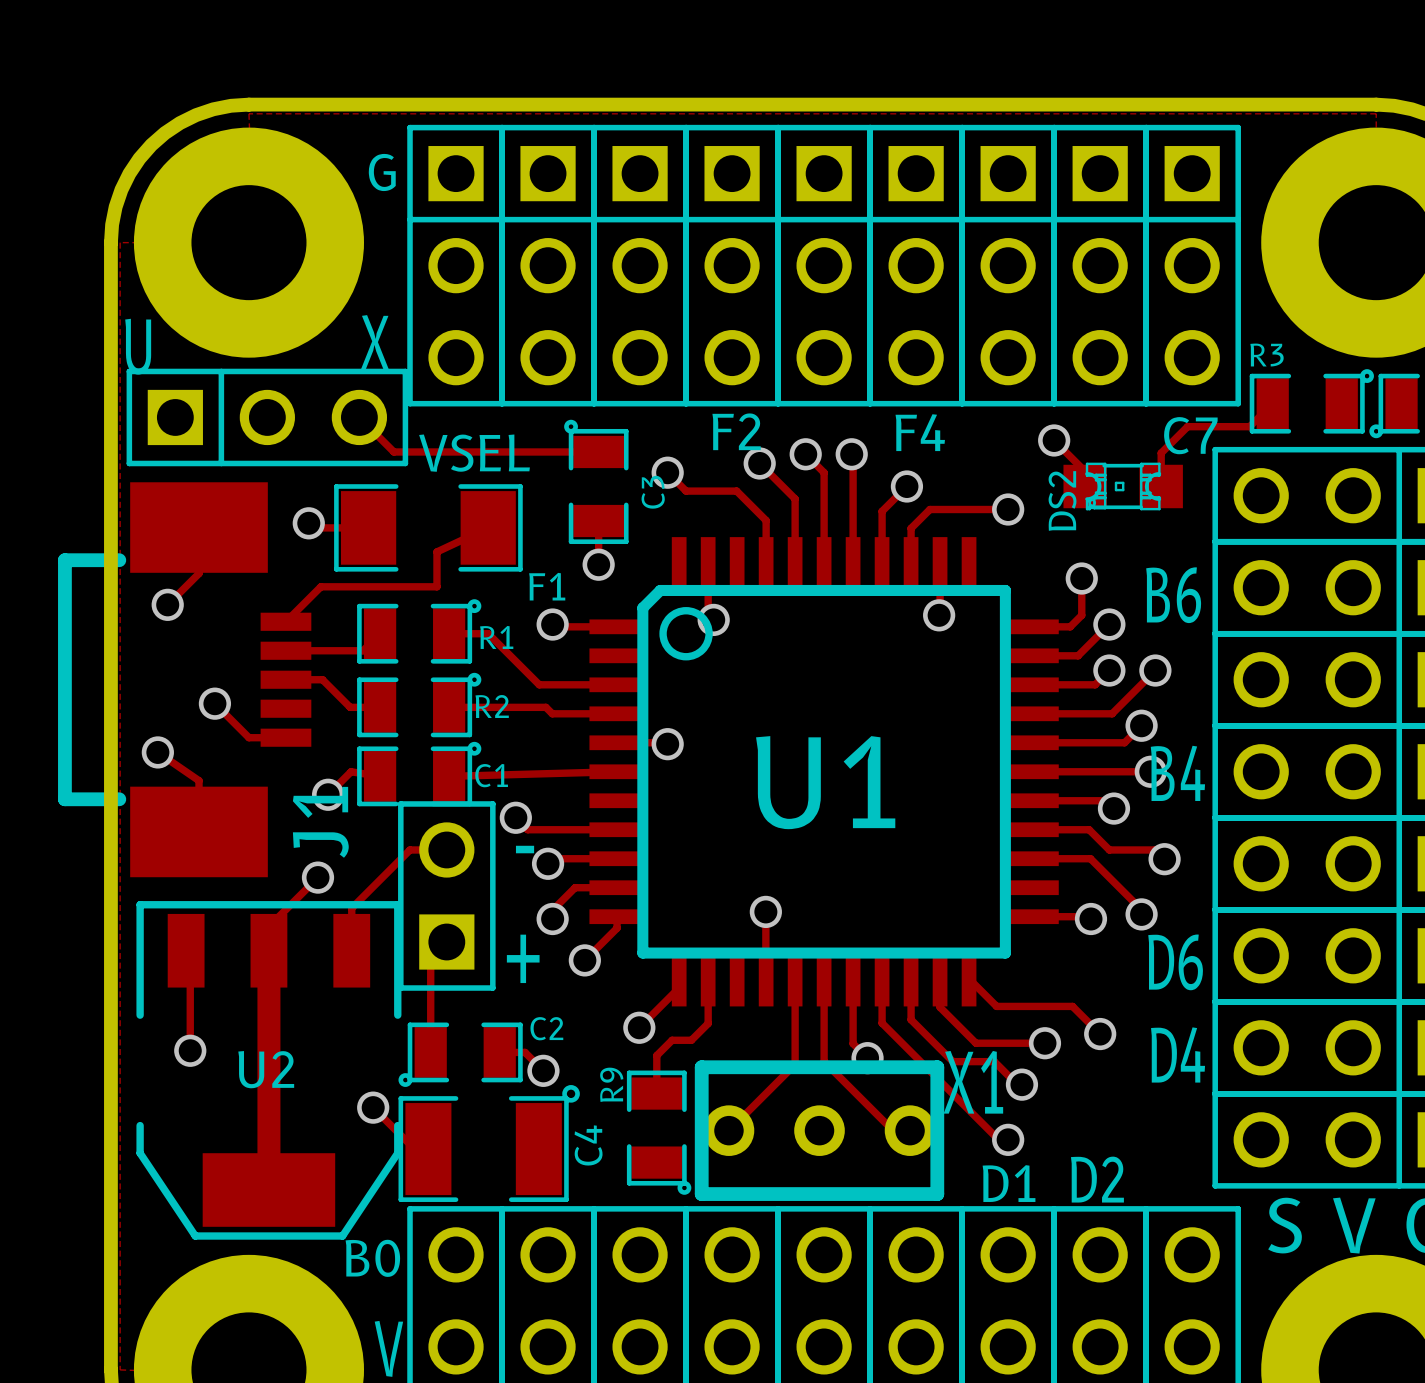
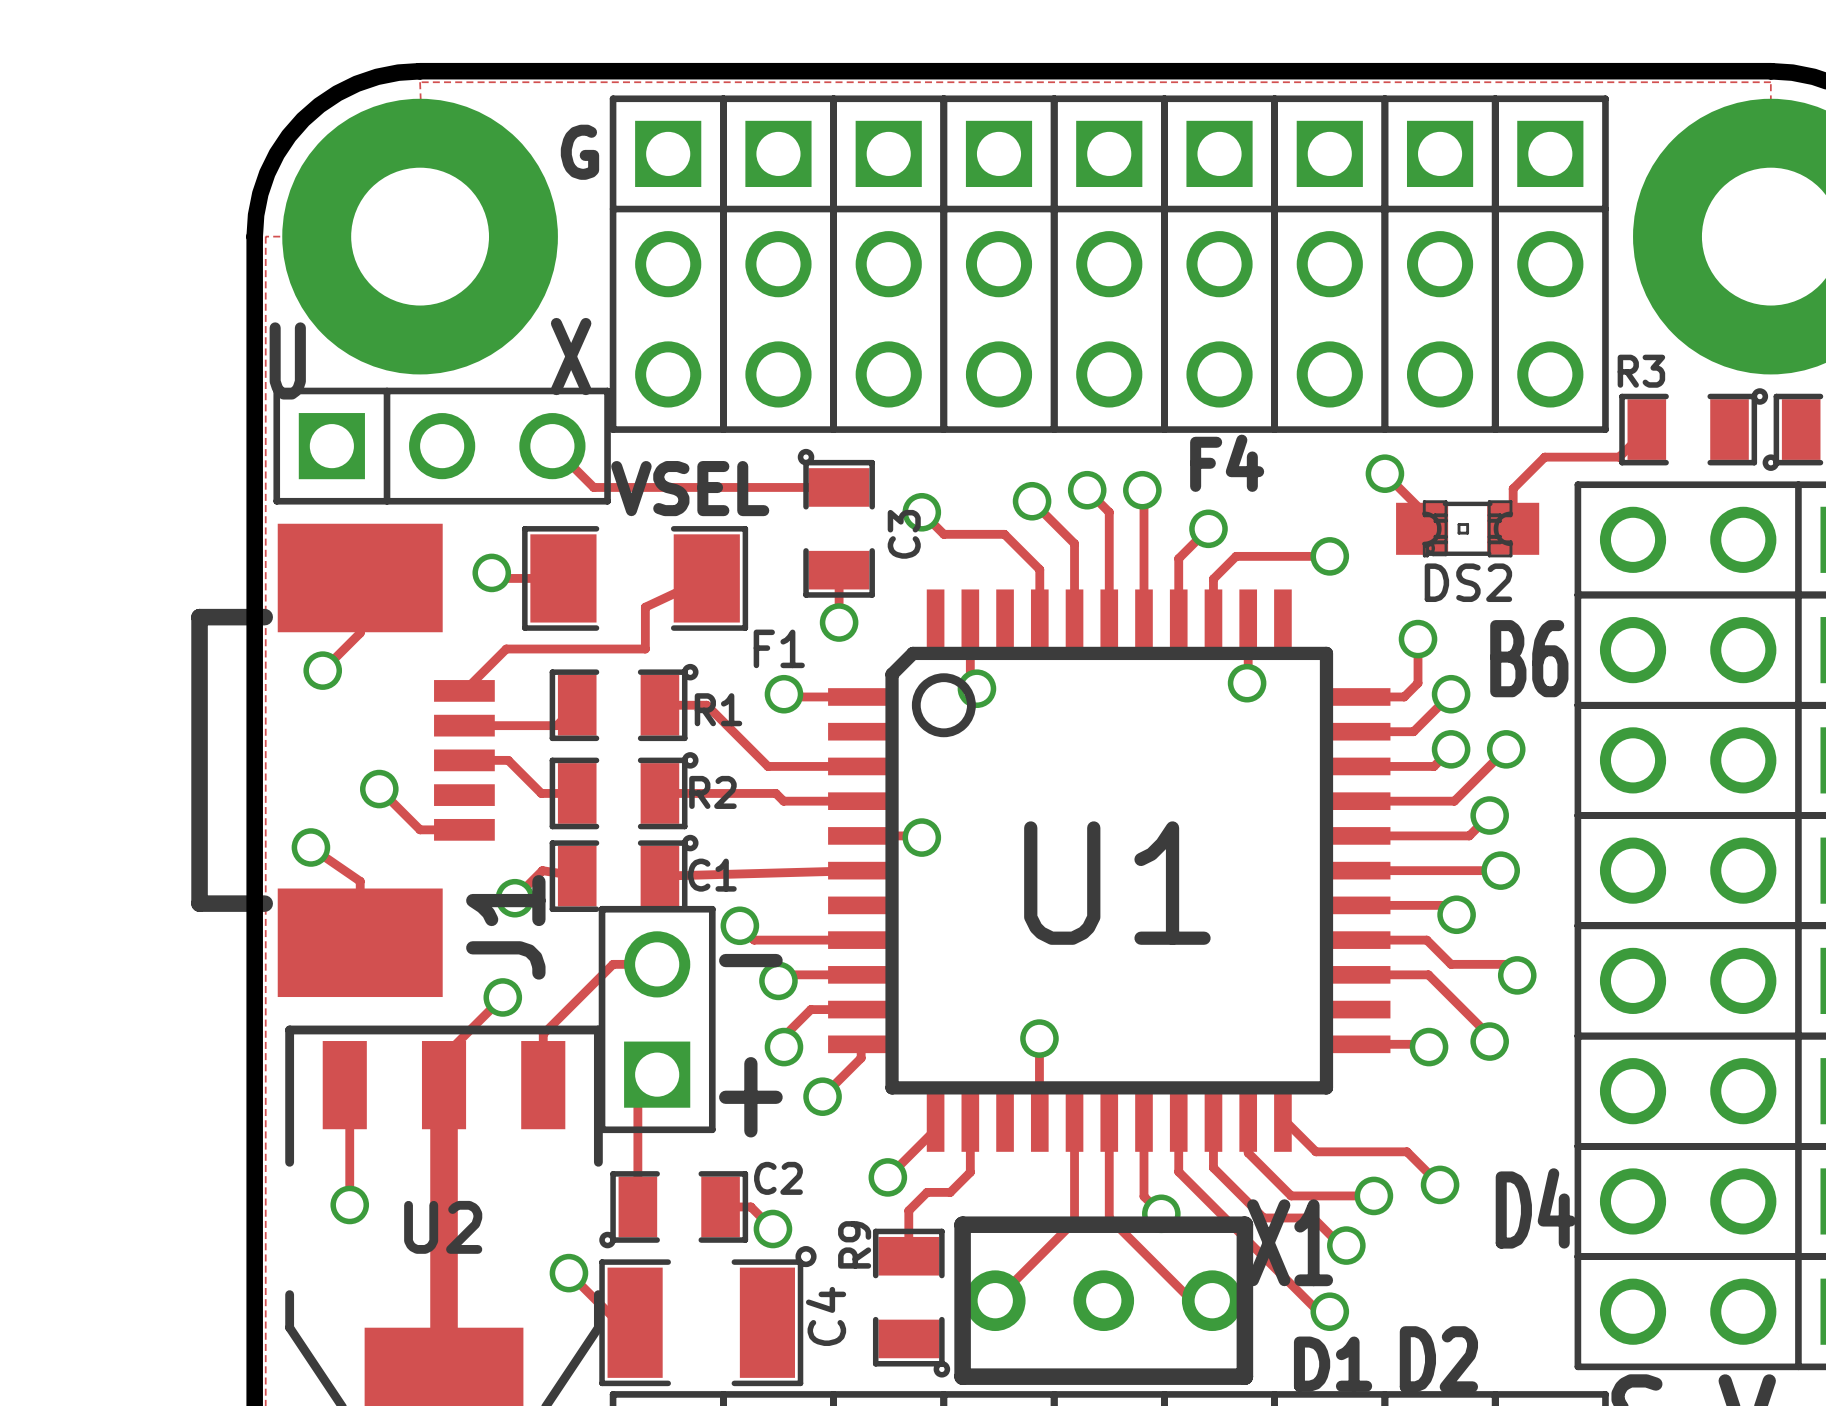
text: F2 (736, 431) -> none
text: C7 (1190, 435) -> none
DS2 name rotation: 0° (1062, 500) -> 90° clockwise (1468, 582)
text: B4 (1177, 773) -> none
text: D6 (1175, 962) -> none

